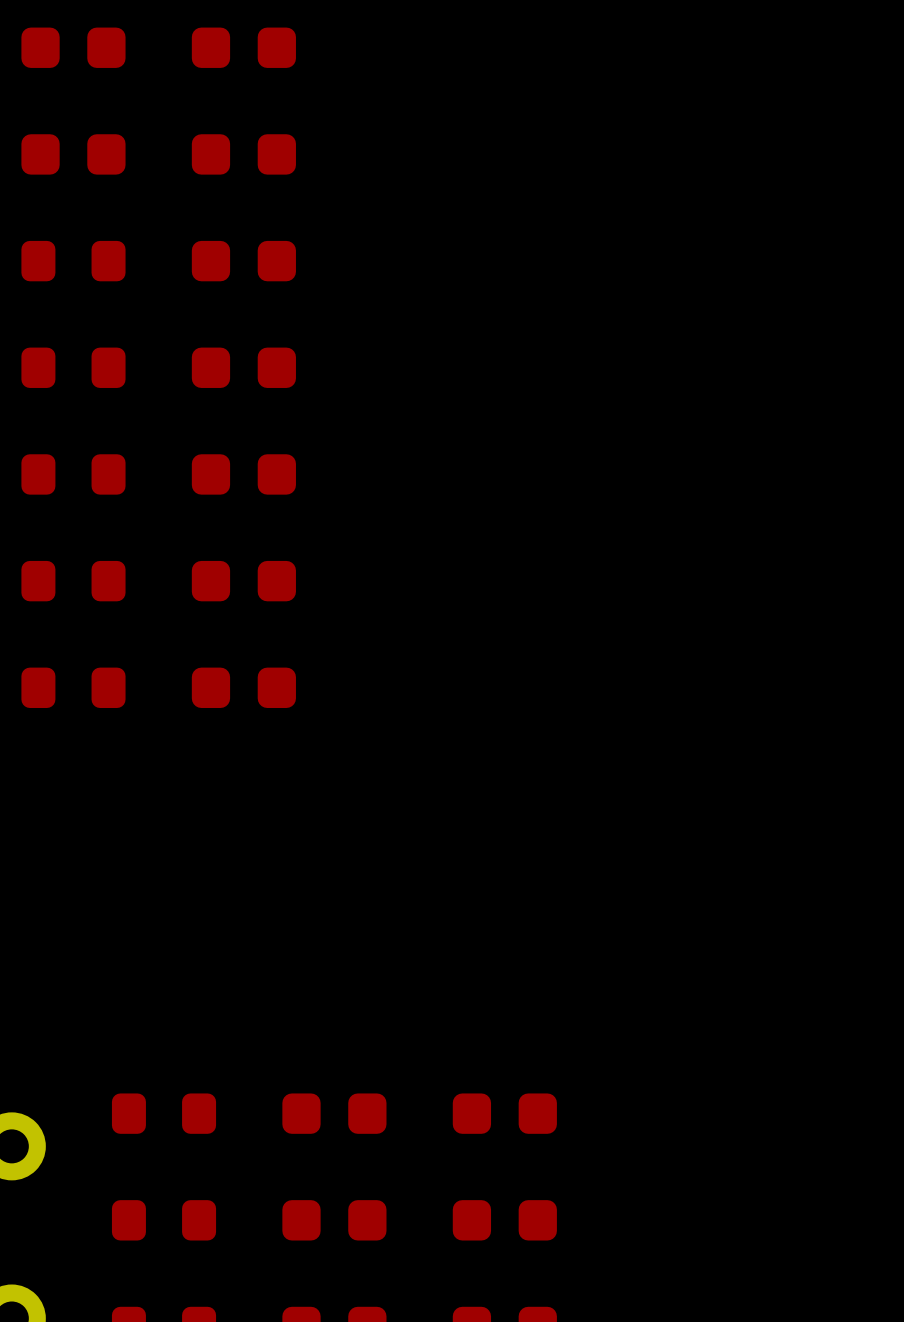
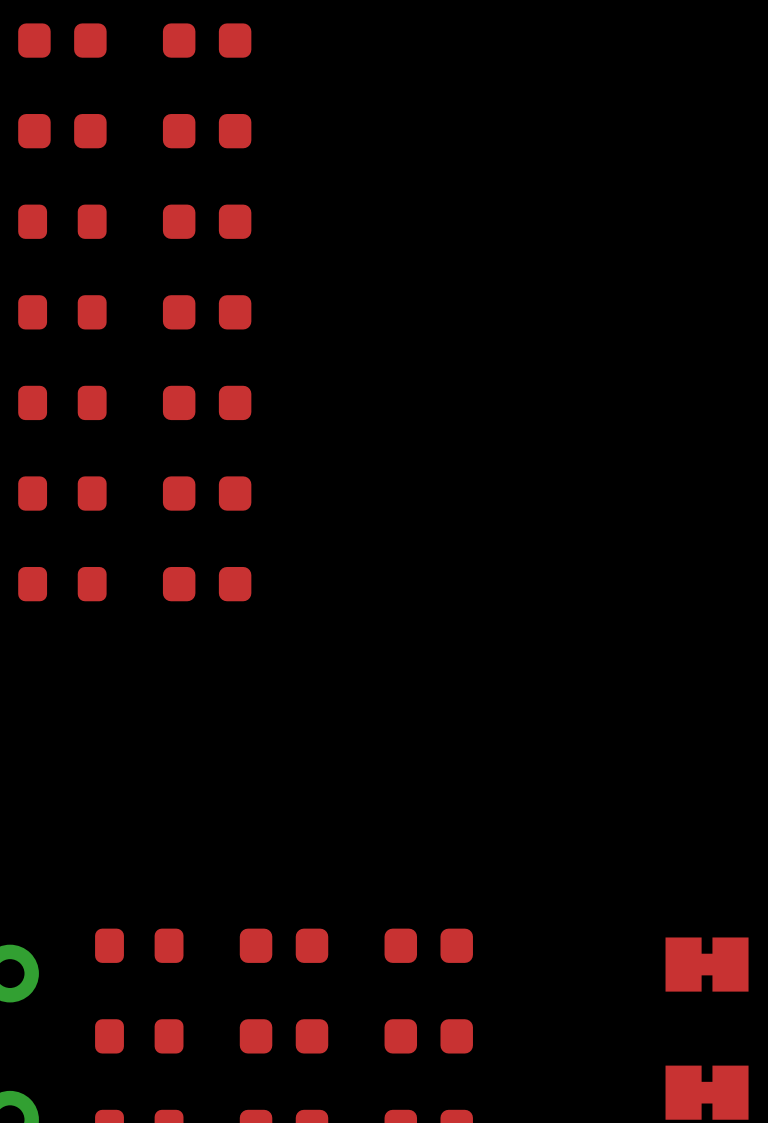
part: none -> (707, 964)
part: none -> (707, 1092)

